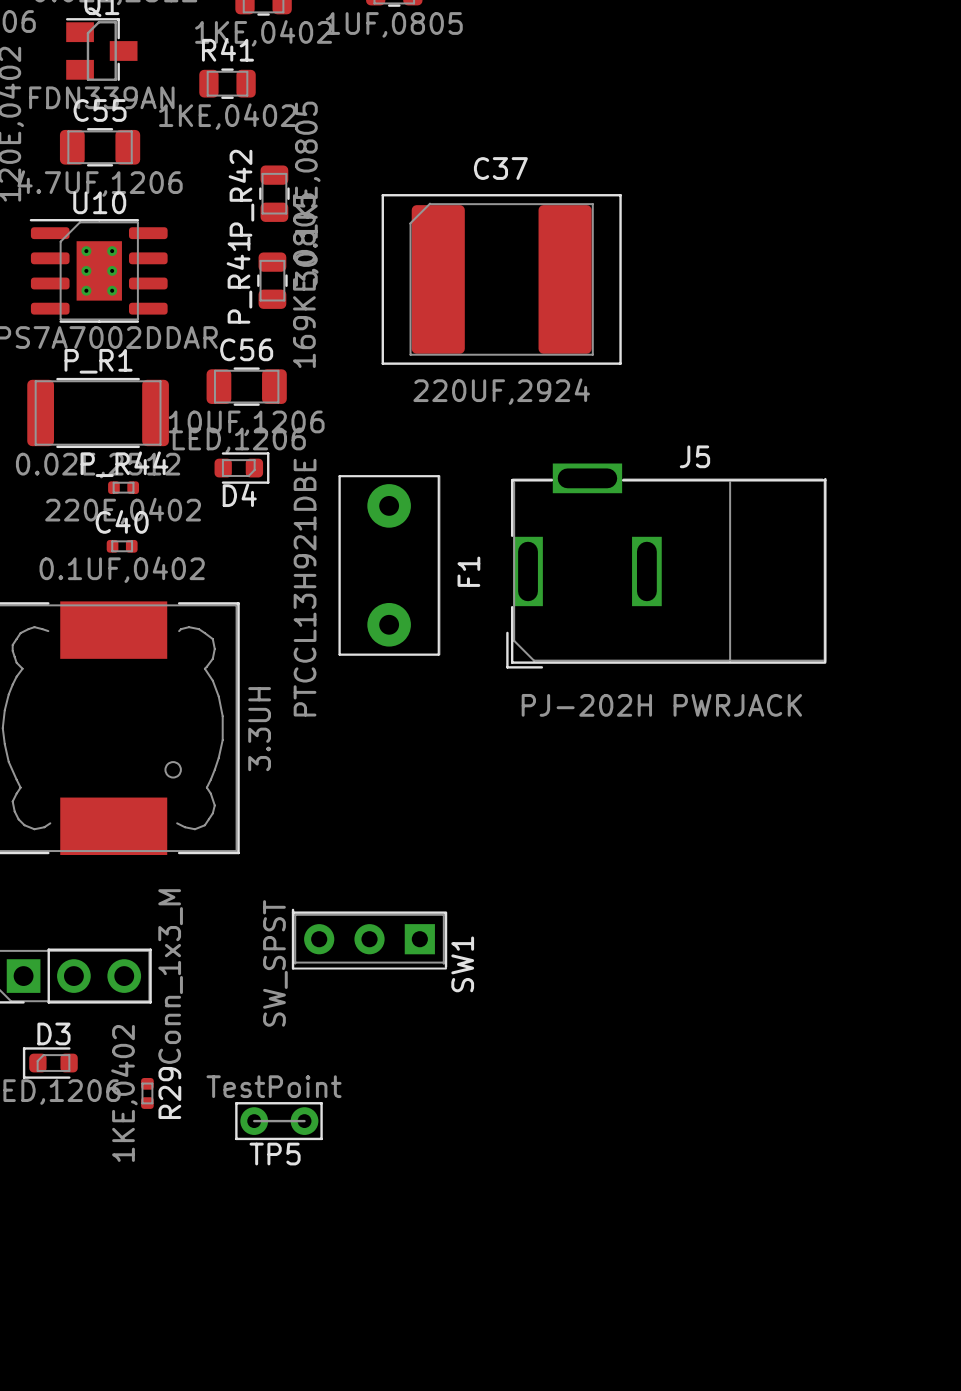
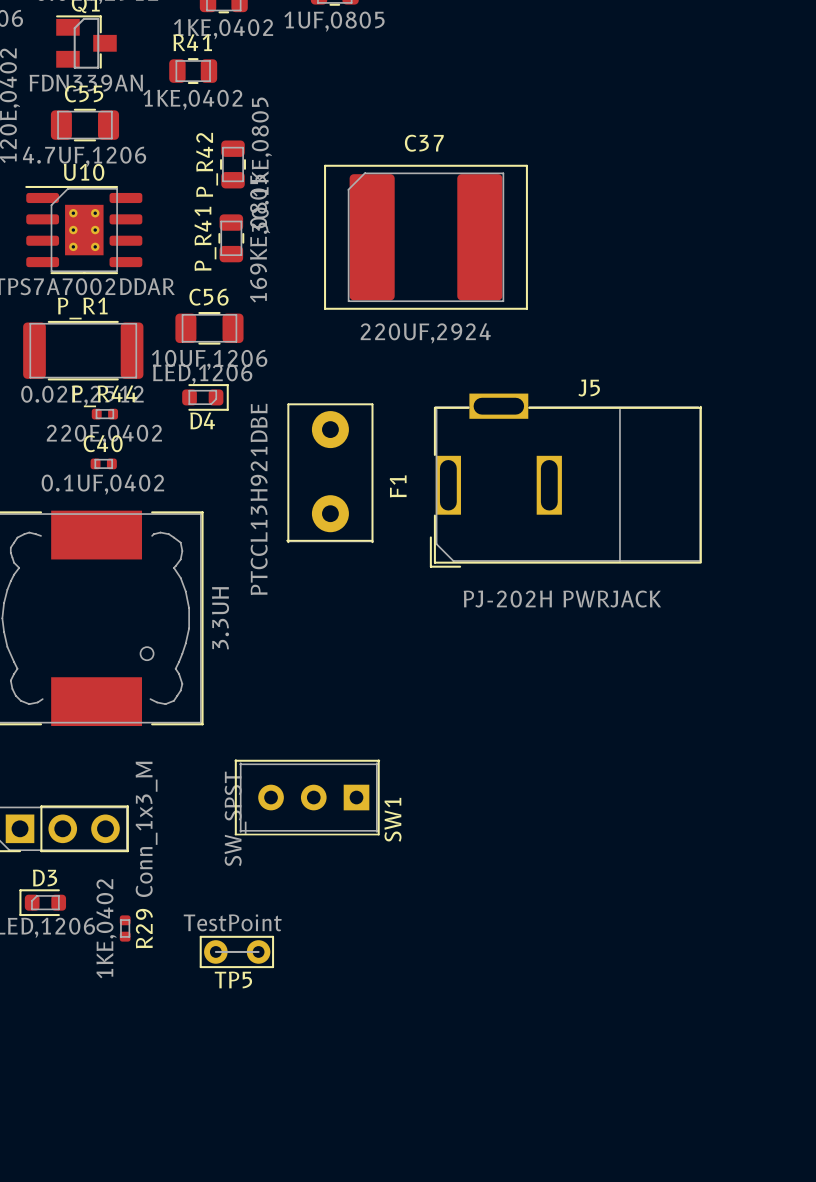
F1 footprint: [338, 475, 441, 656] -> [286, 403, 374, 544]
SW1 footprint: [291, 908, 448, 970] -> [234, 759, 381, 836]

